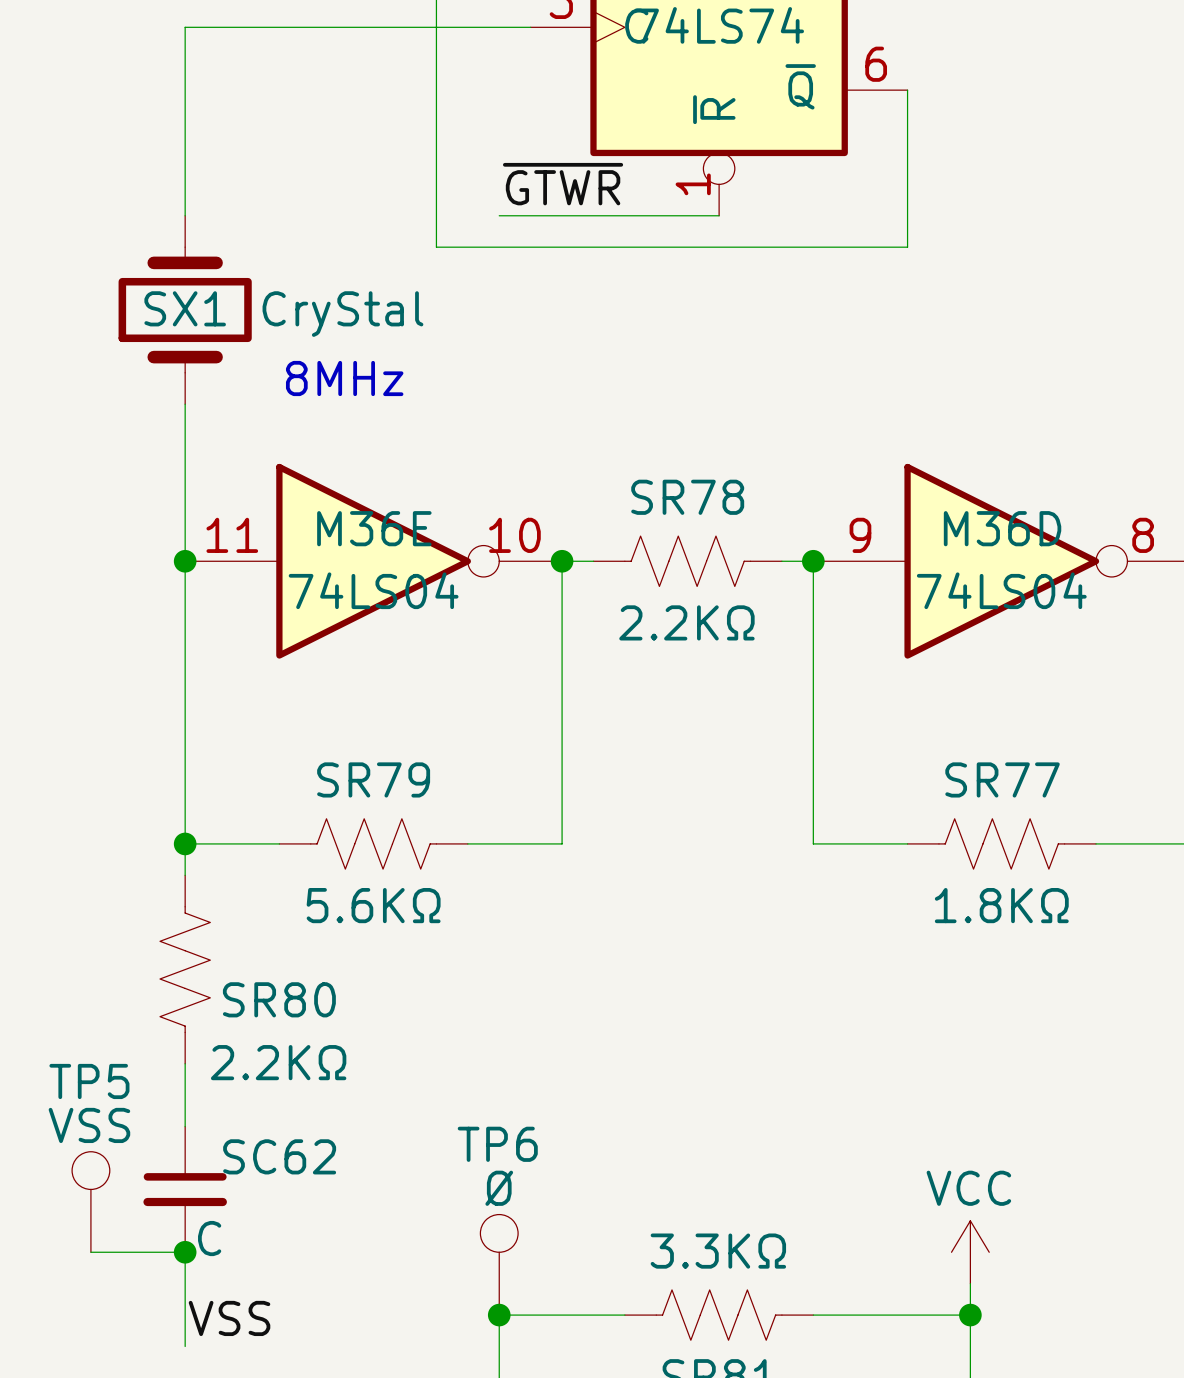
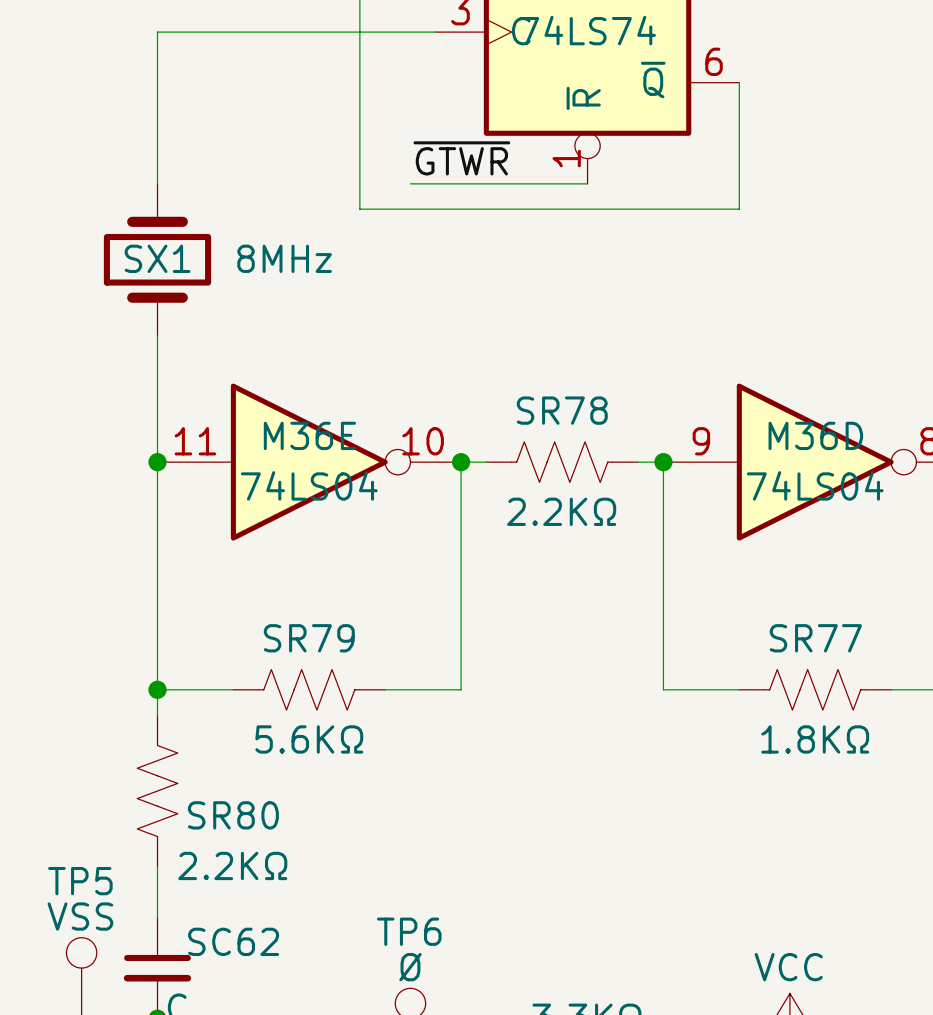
SX1 value: CryStal (342, 314) -> 8MHz (284, 258)
text: 8MHz (344, 378) -> none

